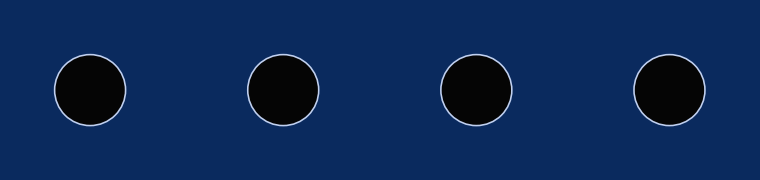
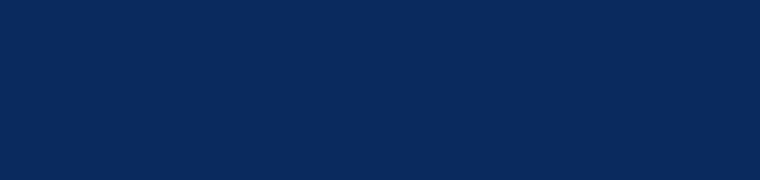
part: (90, 90) -> none
part: (283, 90) -> none
part: (476, 90) -> none
part: (669, 90) -> none

